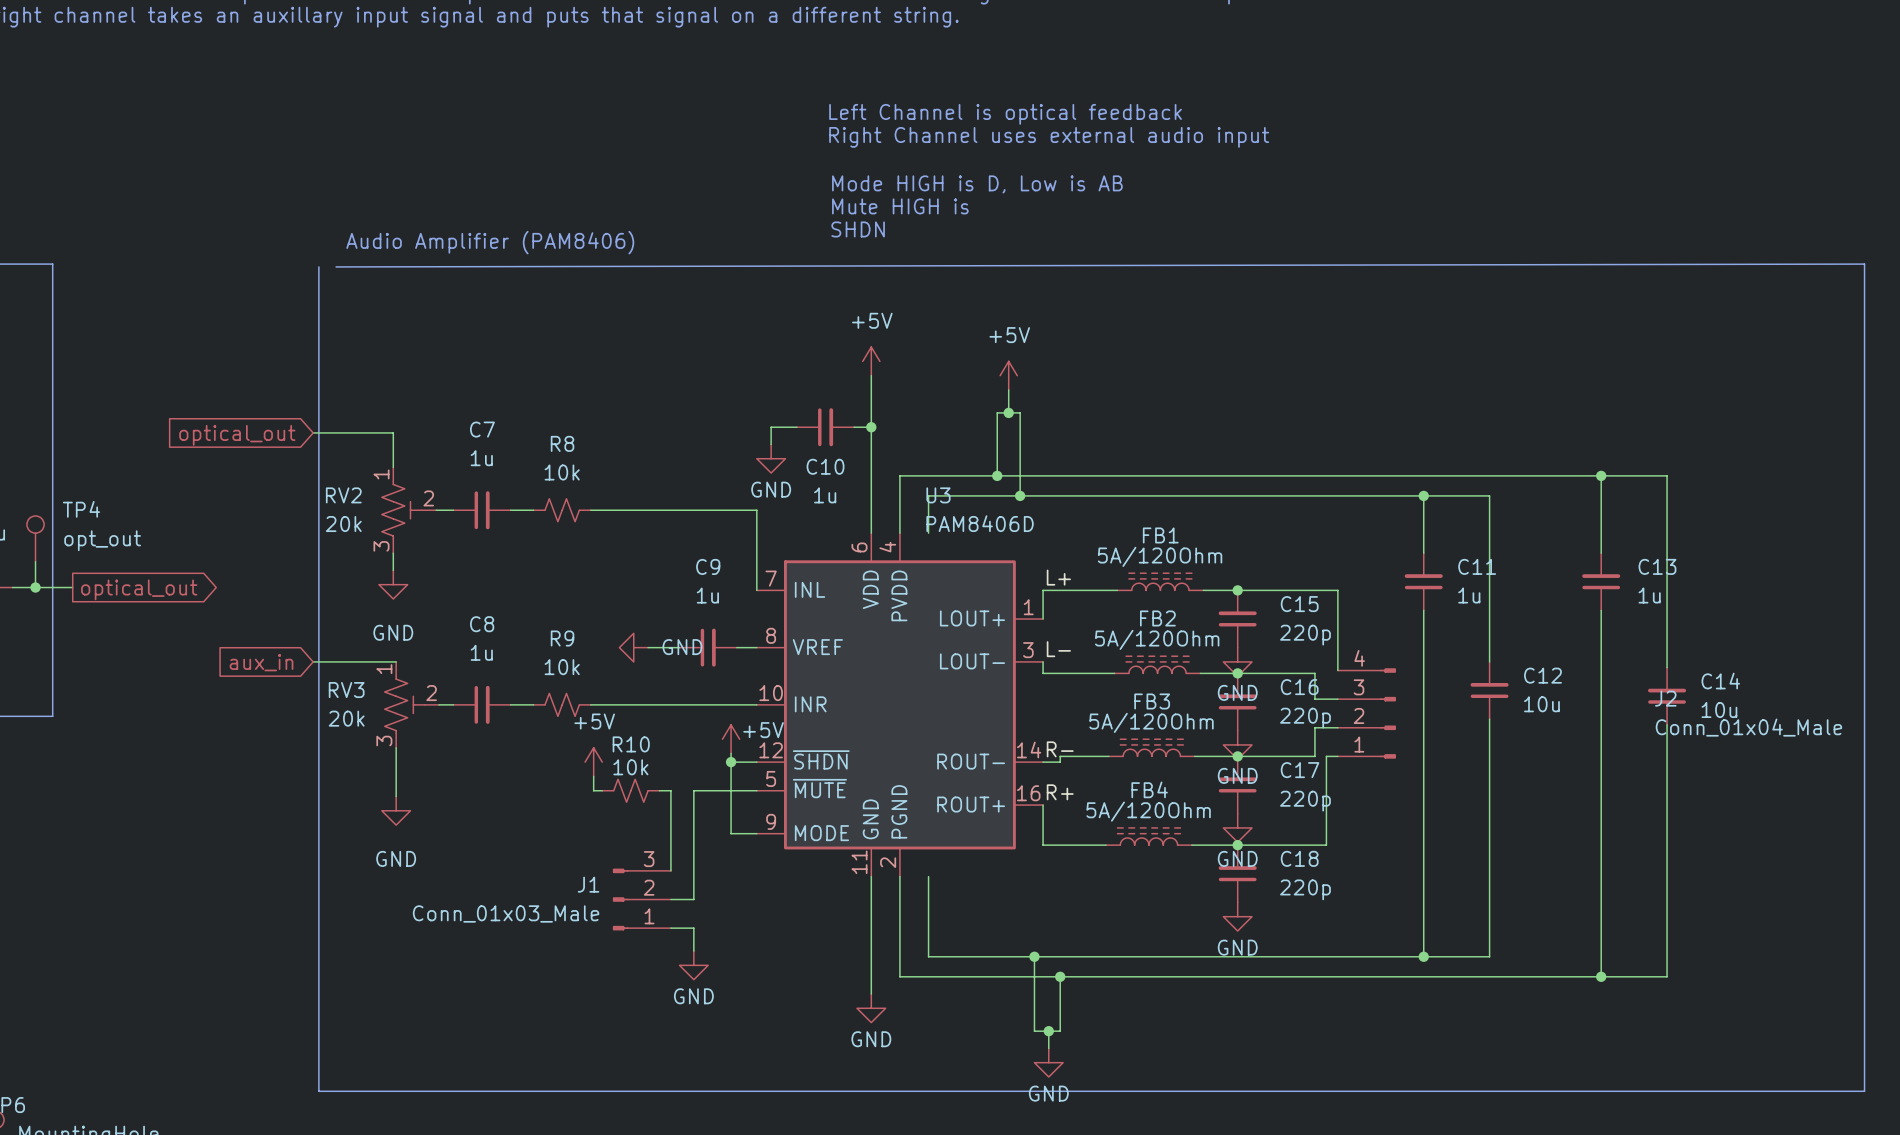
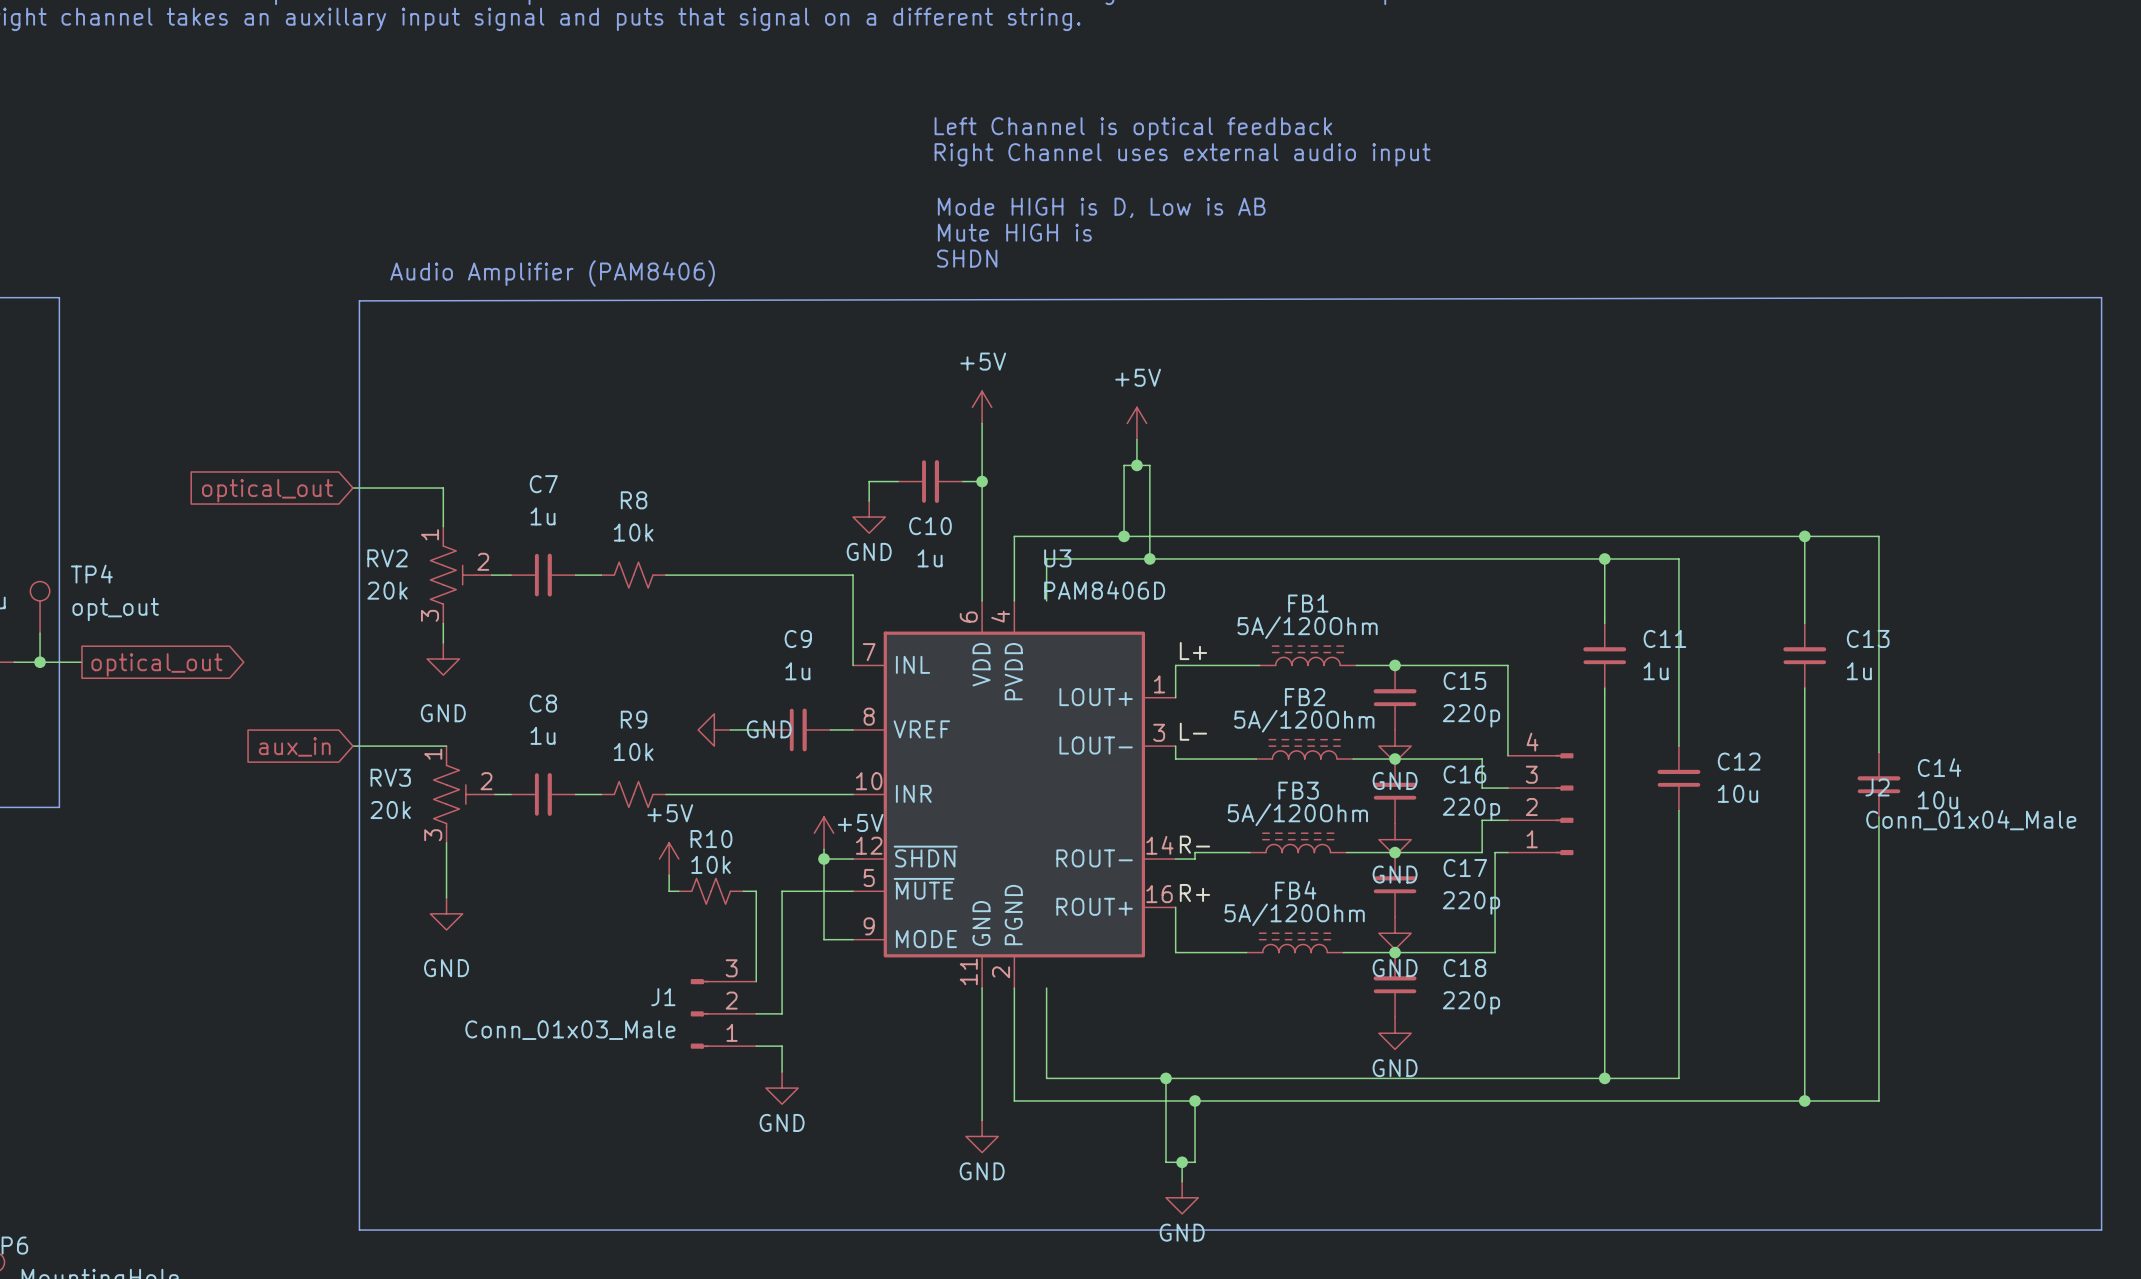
line: (1864, 264) (336, 266) -> (2101, 297) (359, 300)

